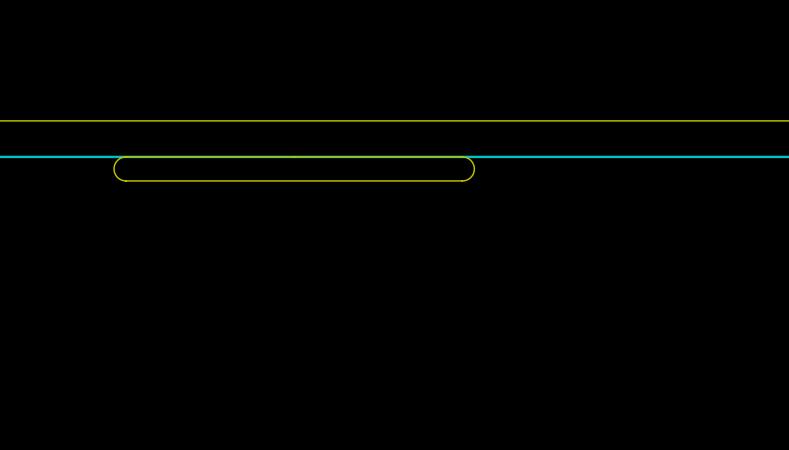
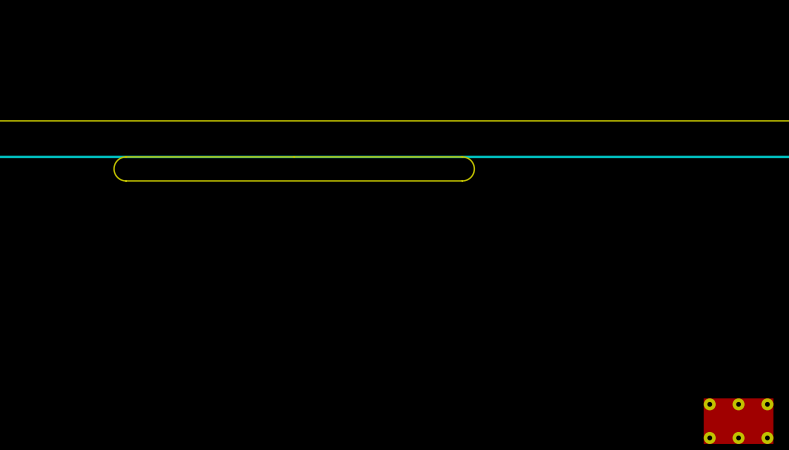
part: none -> (738, 421)

